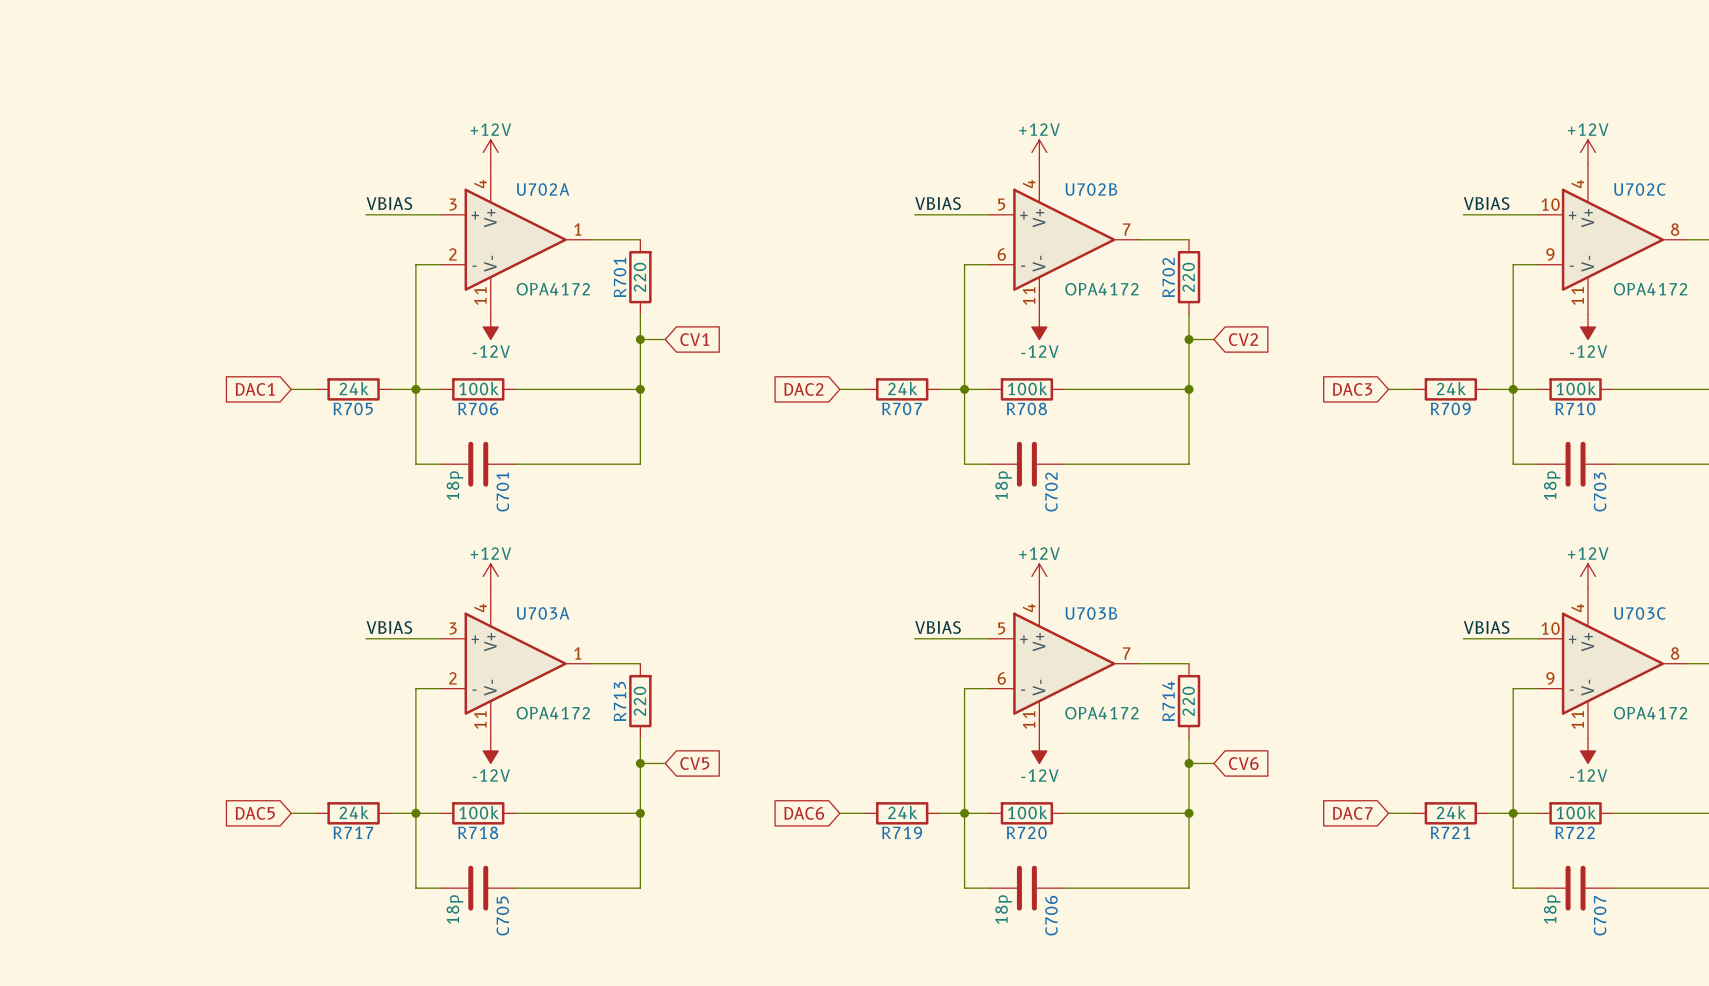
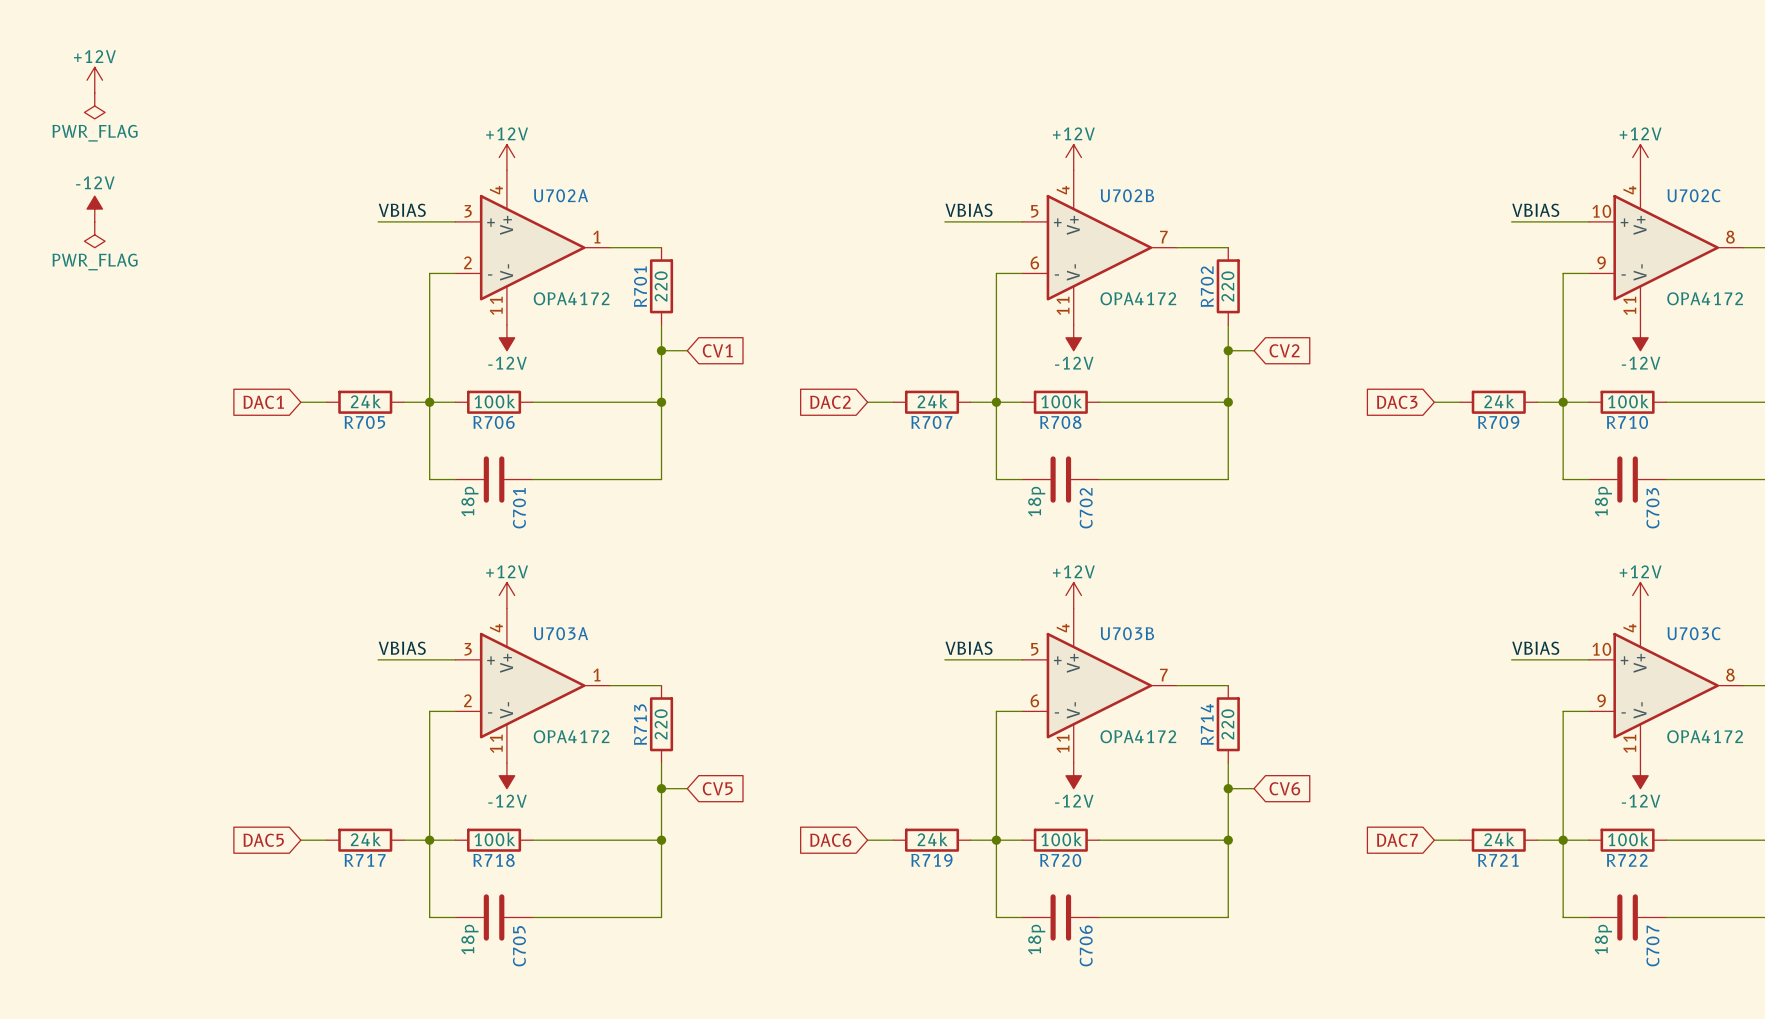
power symbol: none -> +12V (94, 80)
power symbol: none -> PWR_FLAG (94, 105)
power symbol: none -> -12V (94, 209)
power symbol: none -> PWR_FLAG (94, 234)

